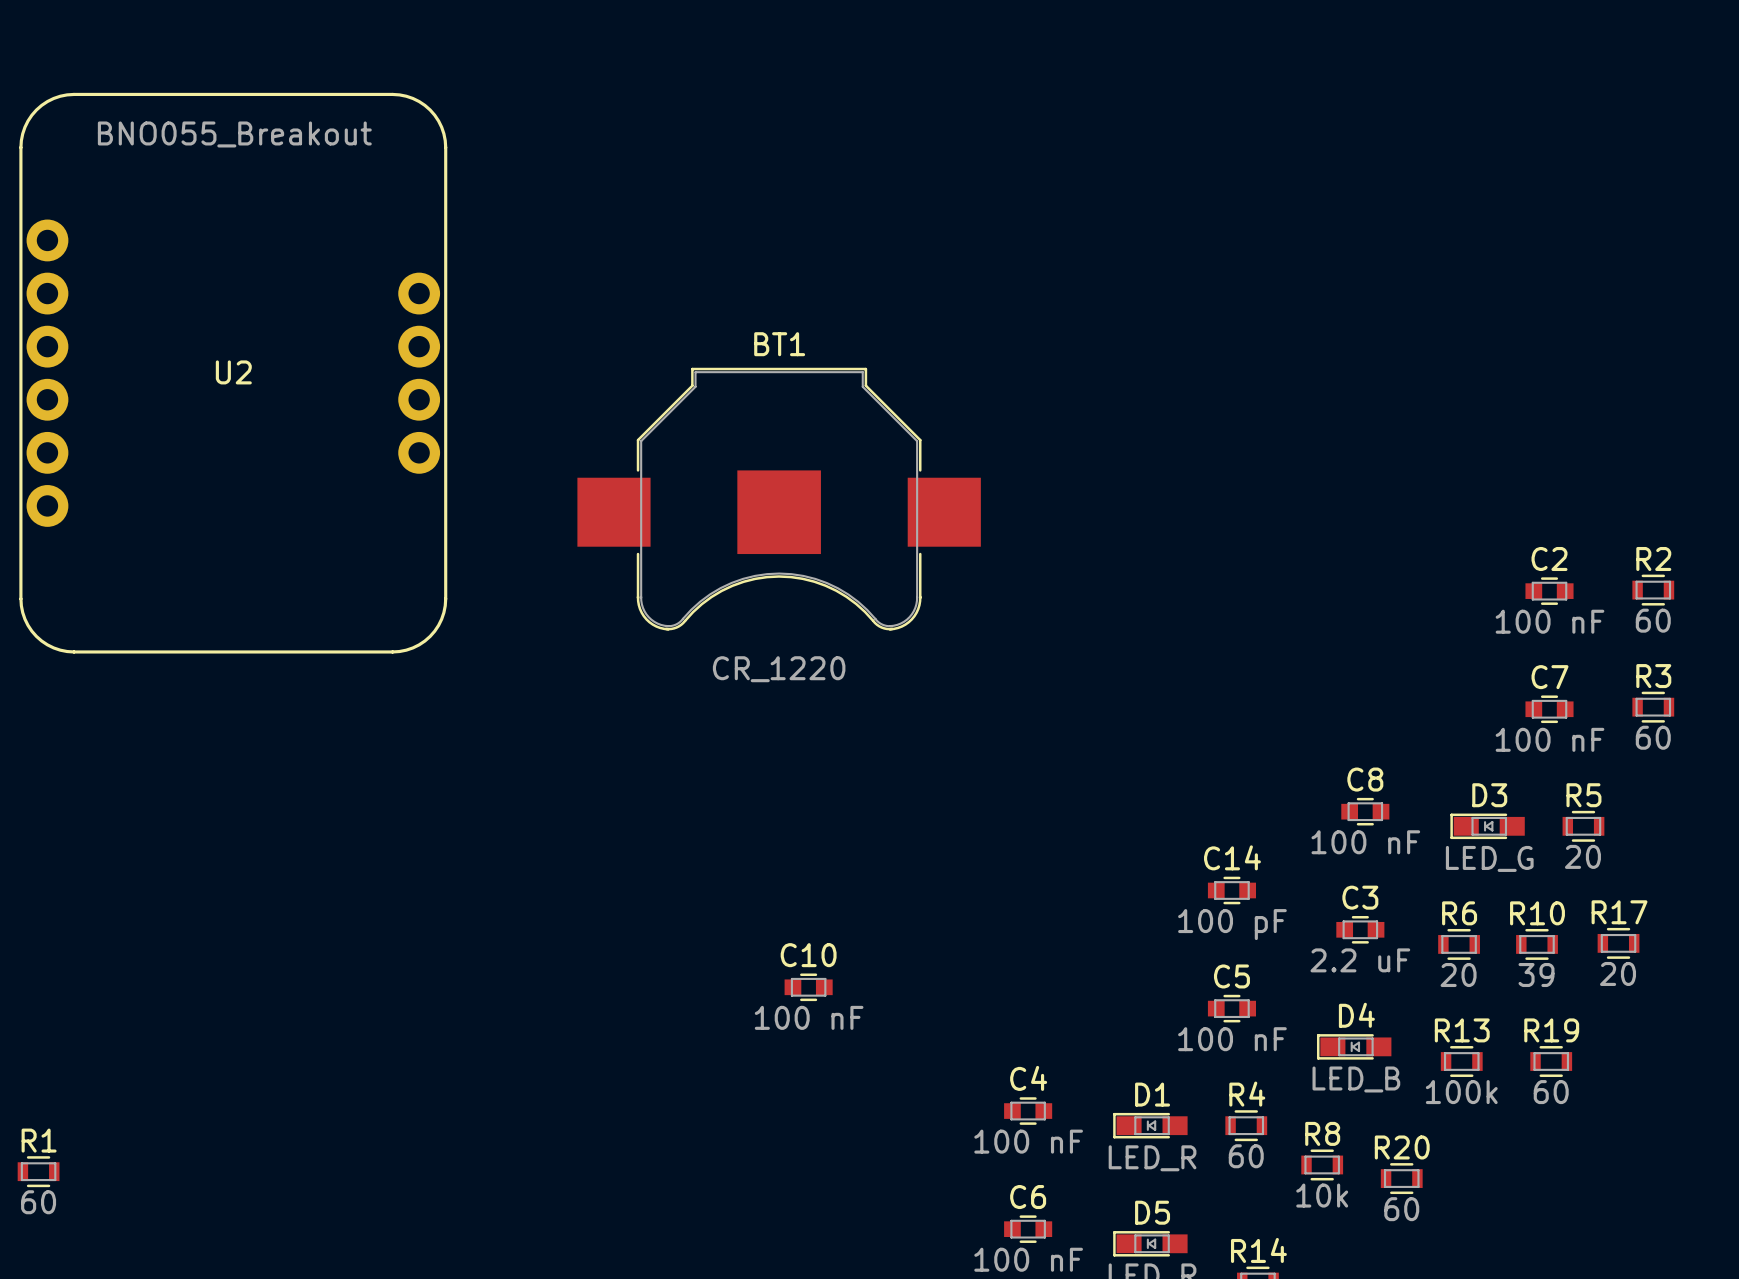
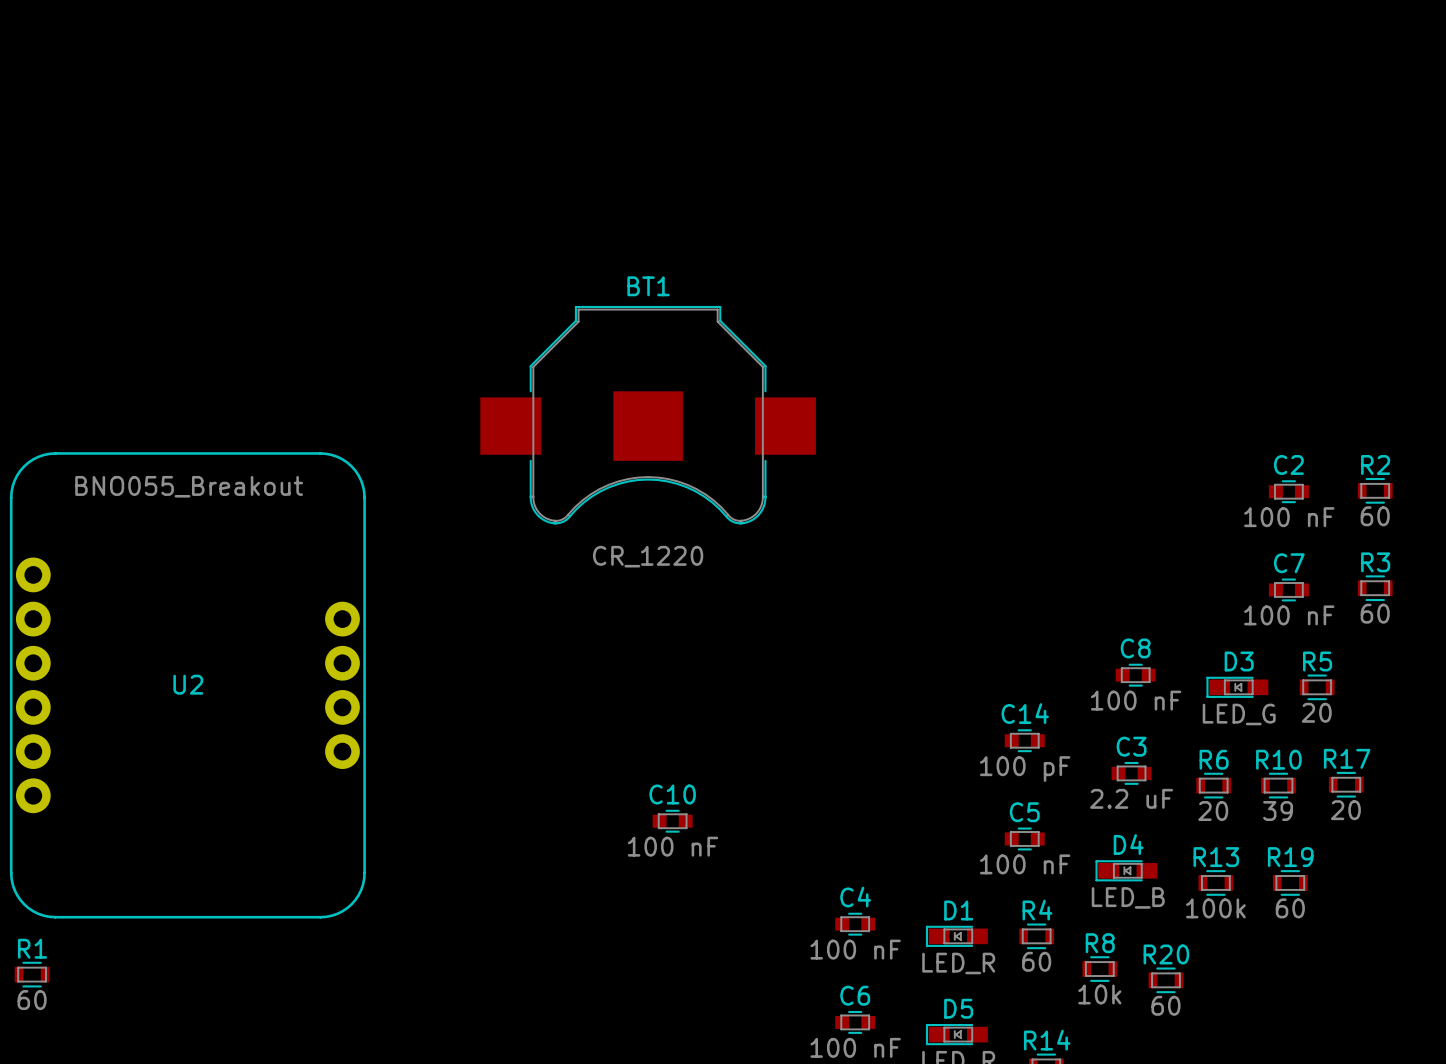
U2 position: (233, 373) -> (187, 685)

